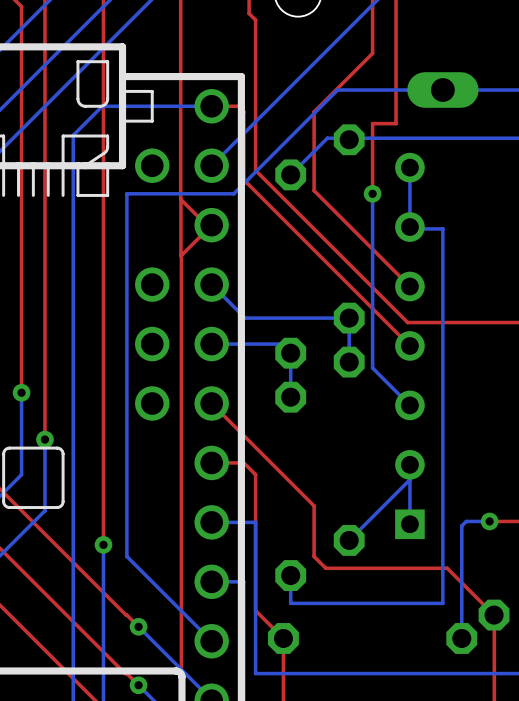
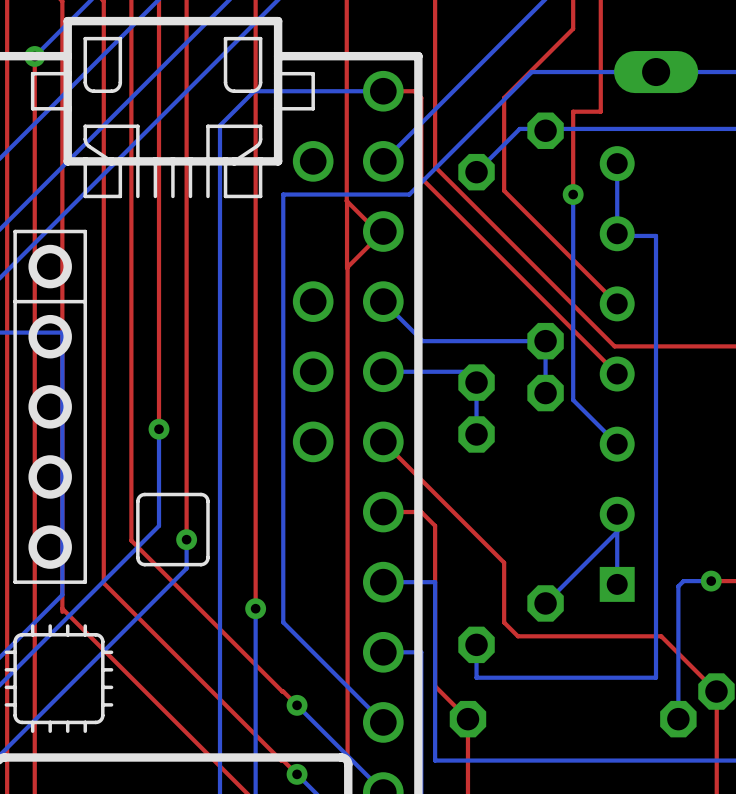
bottom track: (44, 439) (44, 486) -> none
top track: none -> (186, 484) (186, 539)
via position: (44, 439) -> (186, 539)

